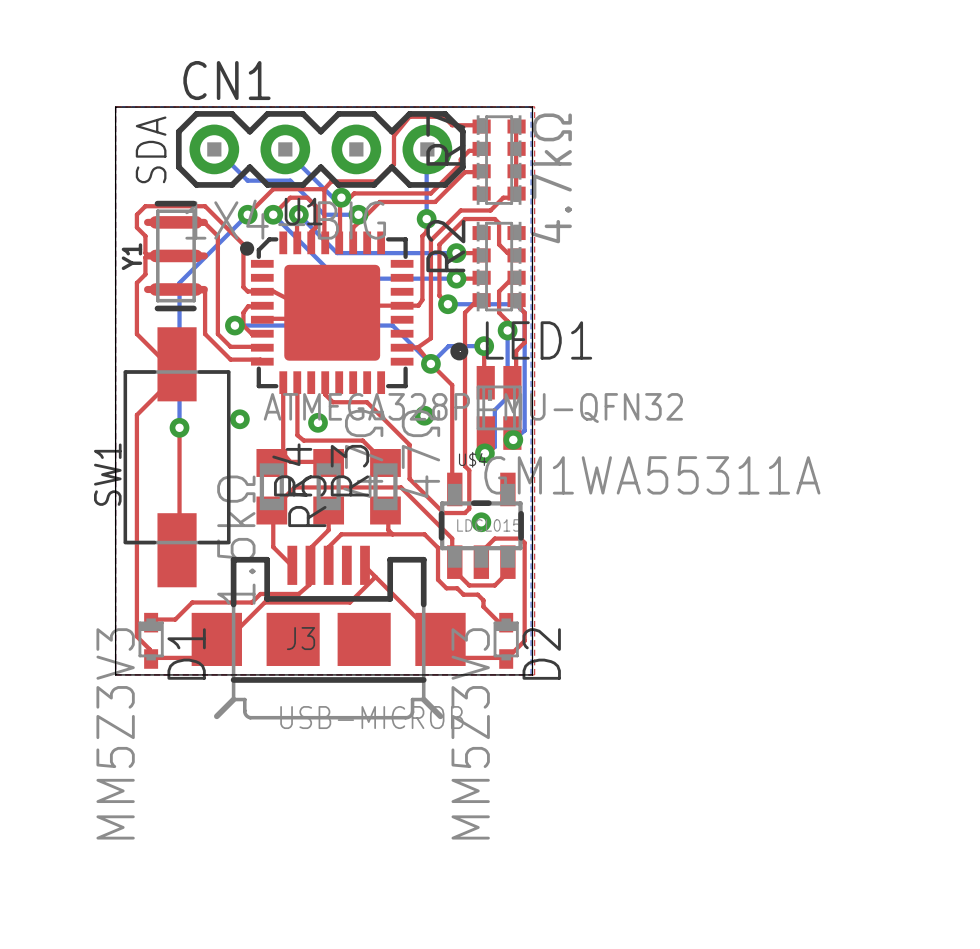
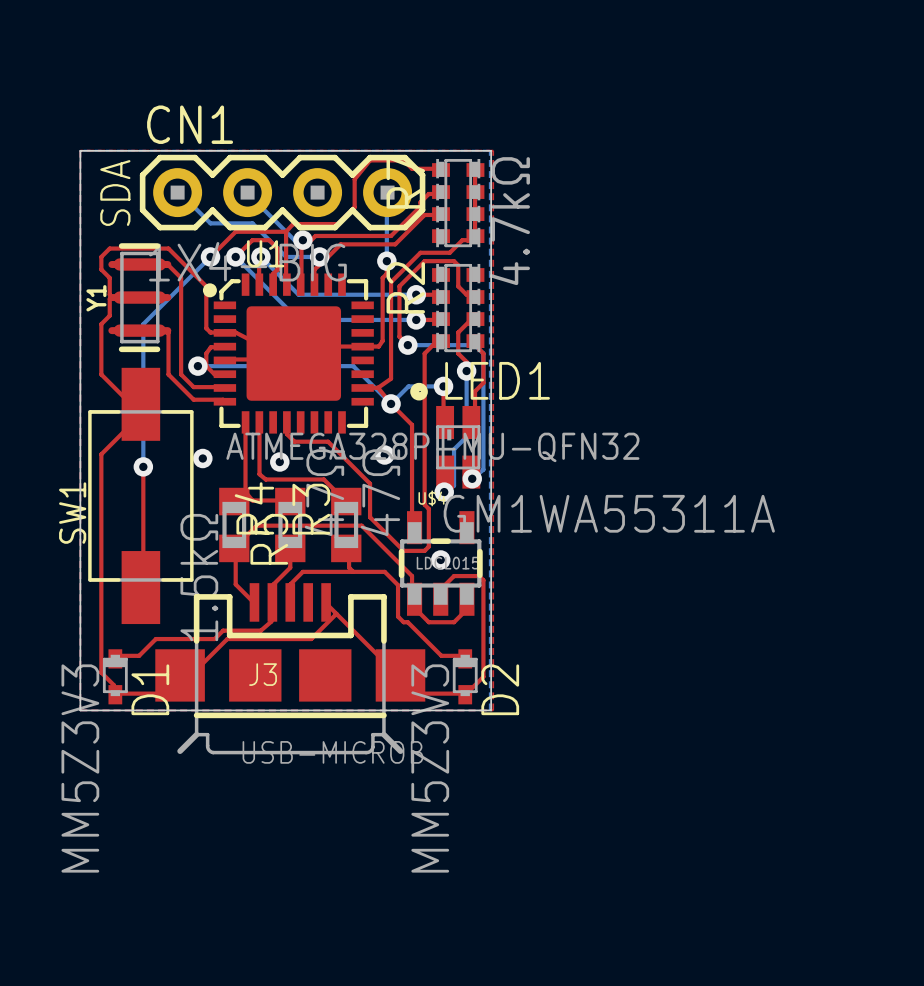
top track: (443, 585) (446, 588) (457, 588) (463, 594) (477, 594) (483, 600) (483, 606) (499, 622) (506, 622) -> (403, 622) (407, 622) (441, 655) (462, 655)

